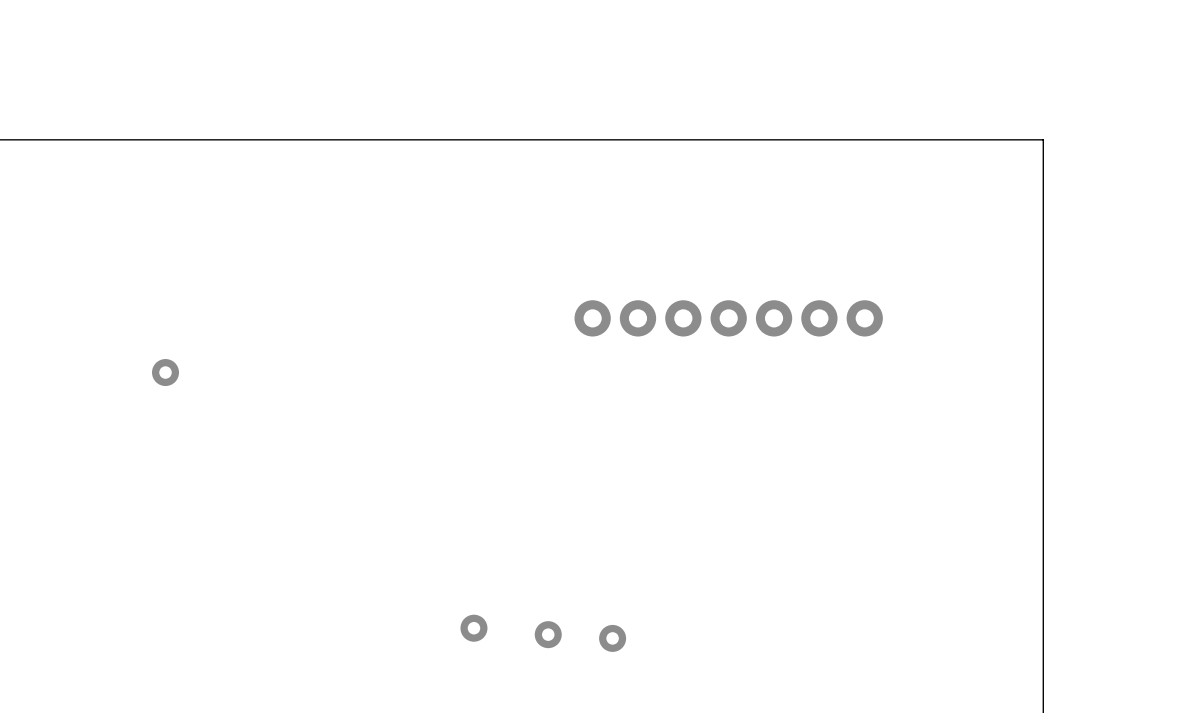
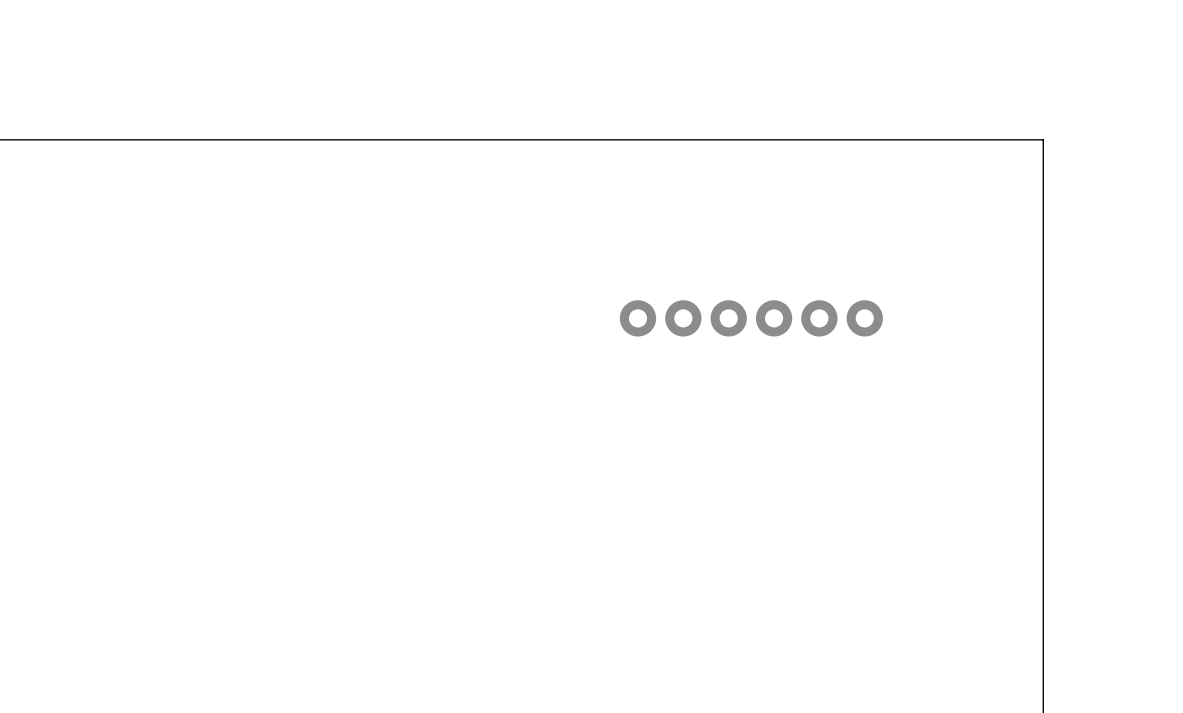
part footprint: [574, 300, 883, 337] -> [619, 300, 883, 337]
via: (165, 372) -> none
via: (473, 628) -> none
via: (548, 634) -> none
via: (612, 638) -> none

